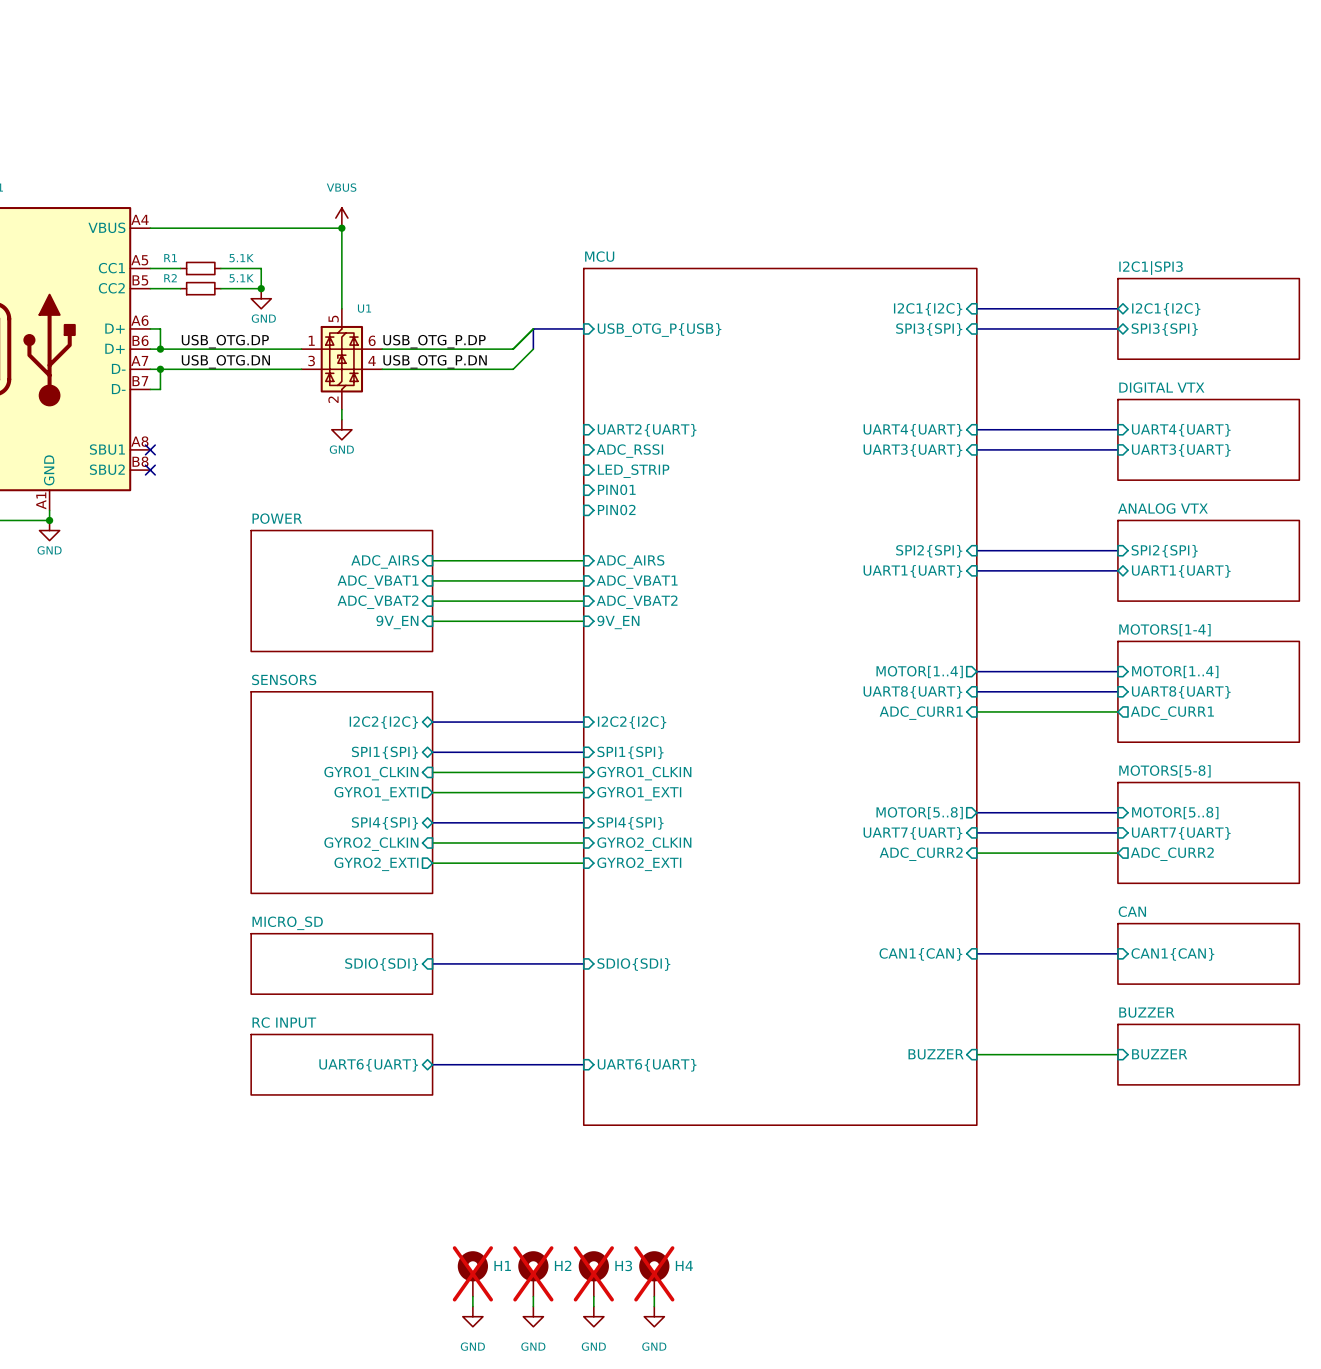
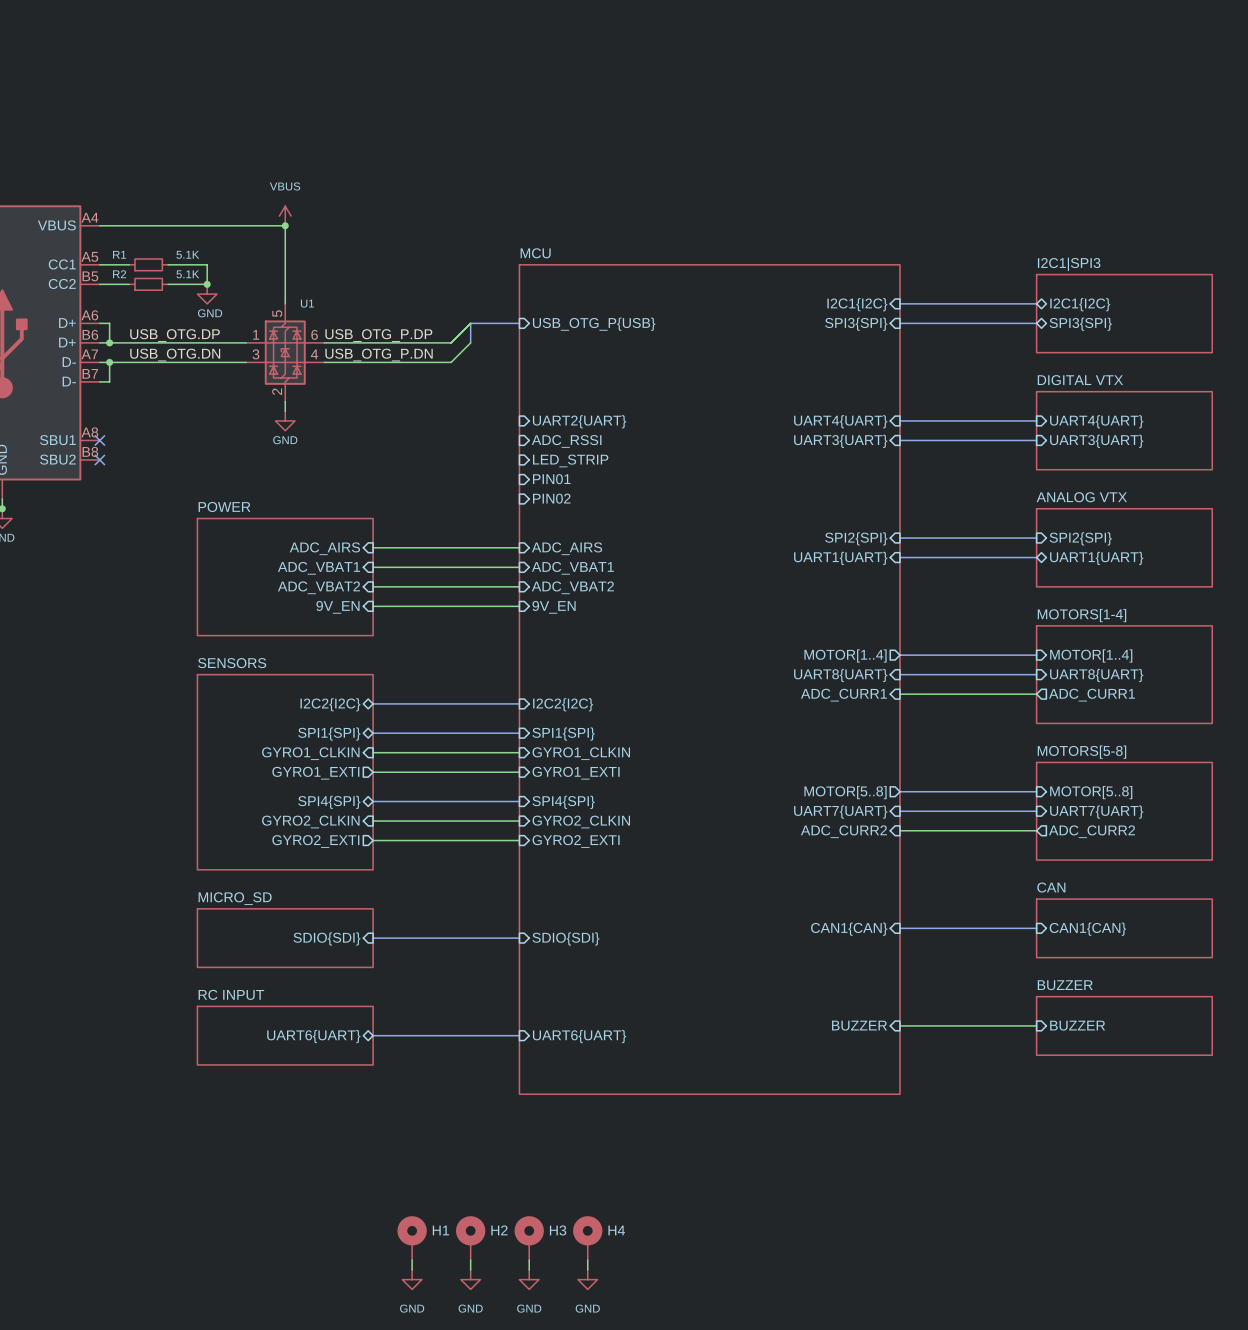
H1 do-not-place cross: (472, 1273) -> none
H2 do-not-place cross: (533, 1273) -> none
H3 do-not-place cross: (593, 1273) -> none
H4 do-not-place cross: (654, 1273) -> none

